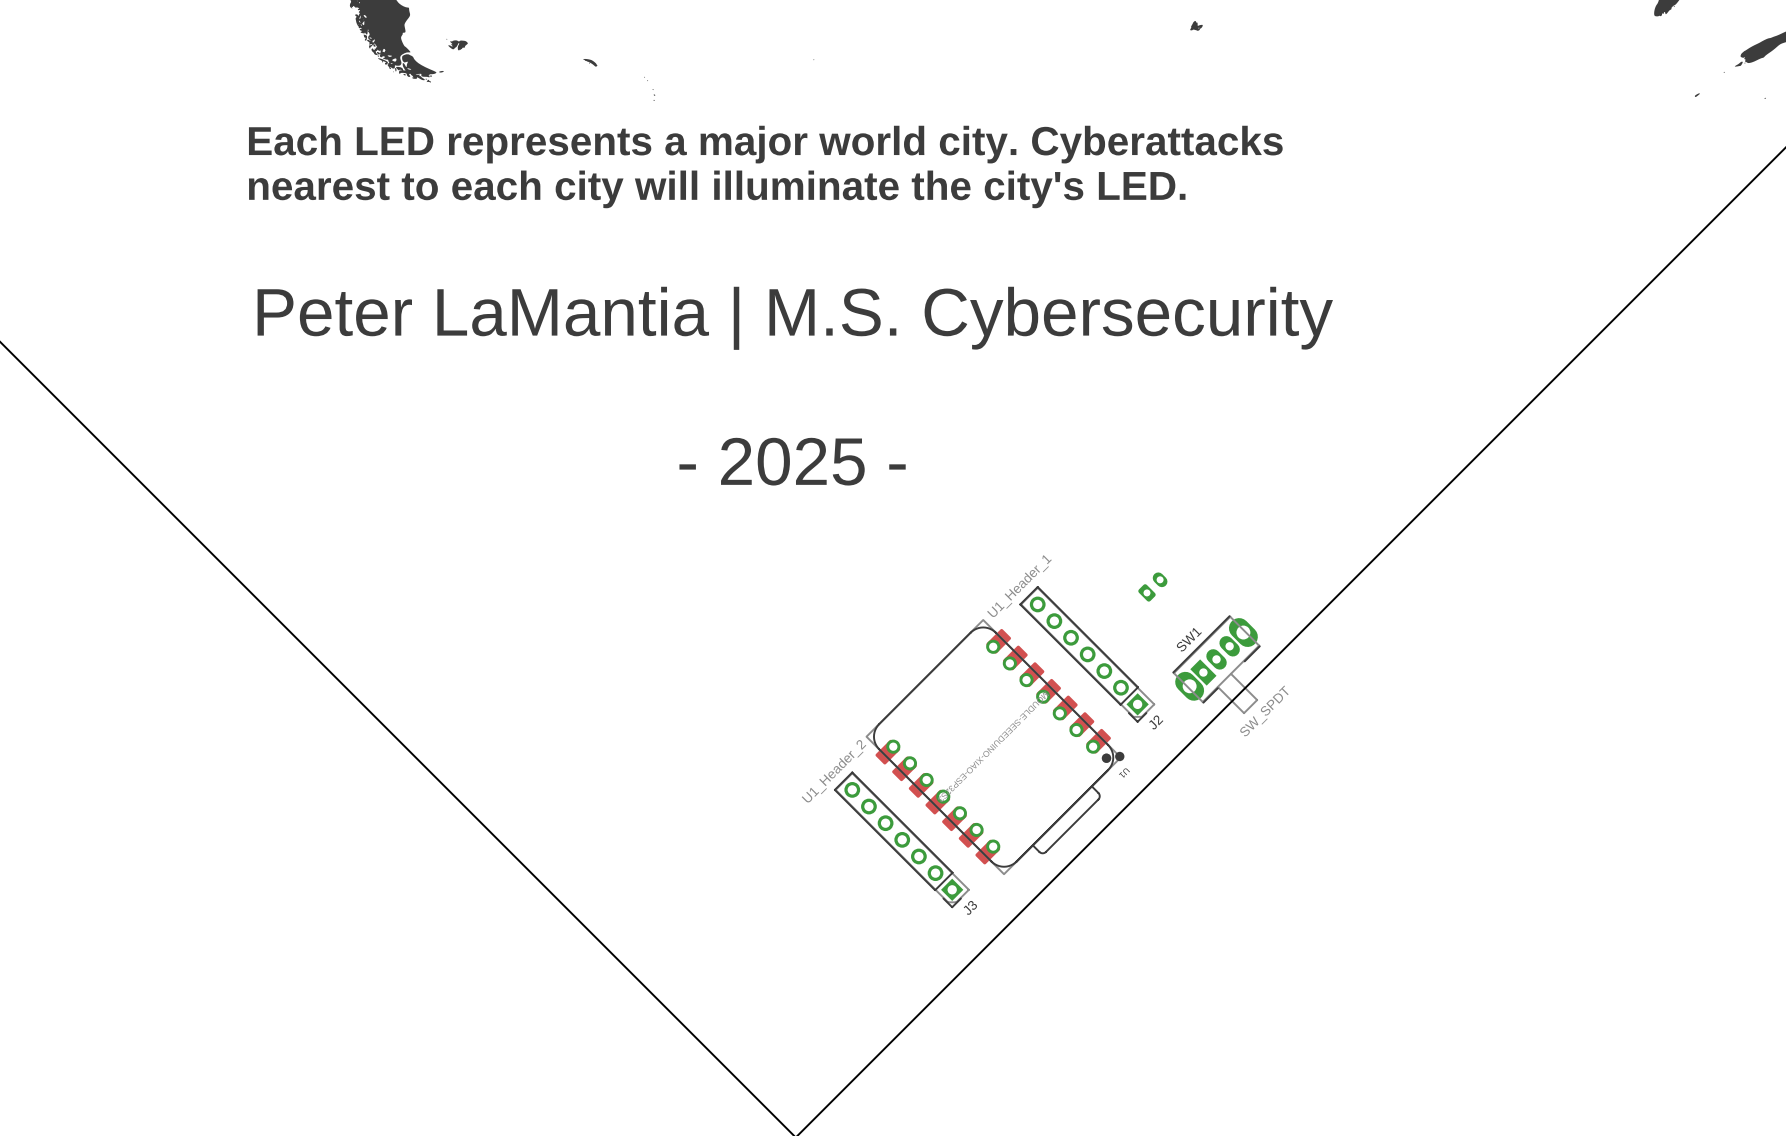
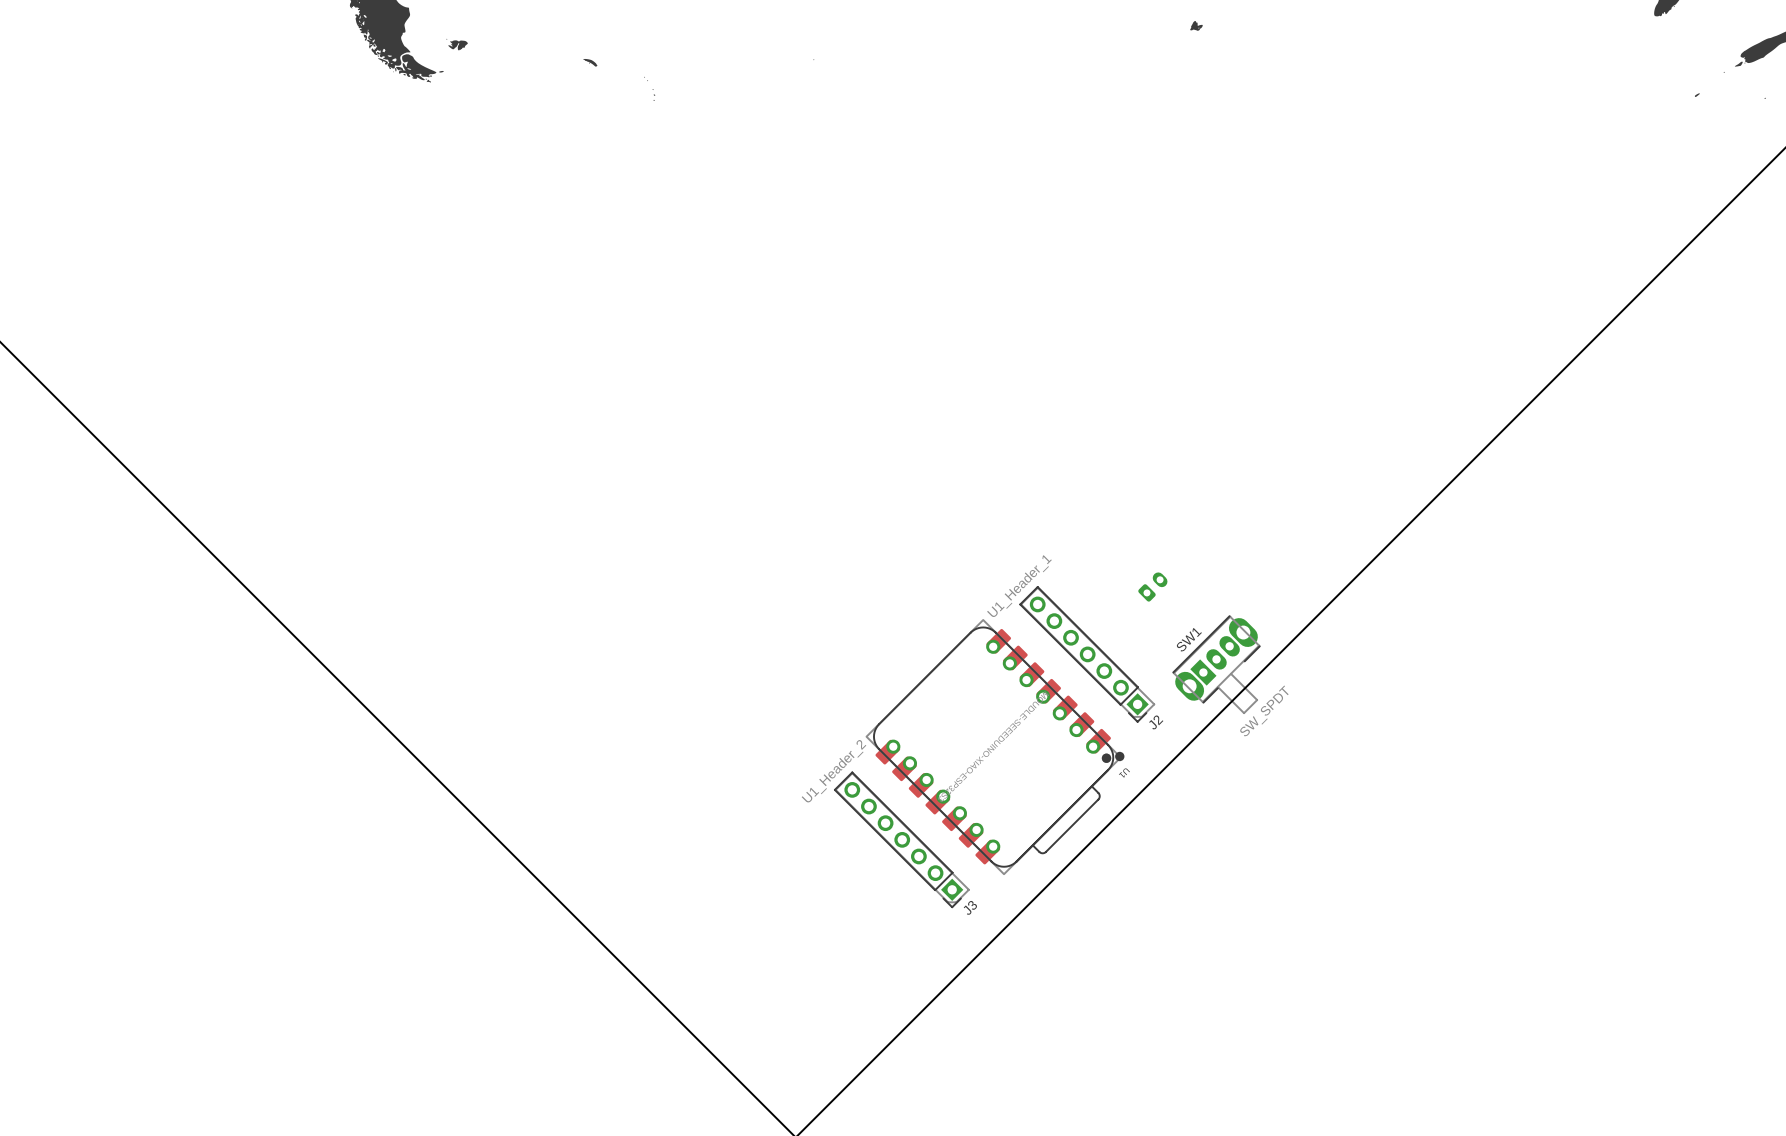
text: Each LED represents a major world city. Cyberattacks (765, 144) -> none
text: nearest to each city will illuminate the city's LED. (717, 189) -> none
text: Peter LaMantia | M.S. Cybersecurity (795, 318) -> none
text: - 2025 - (792, 461) -> none

